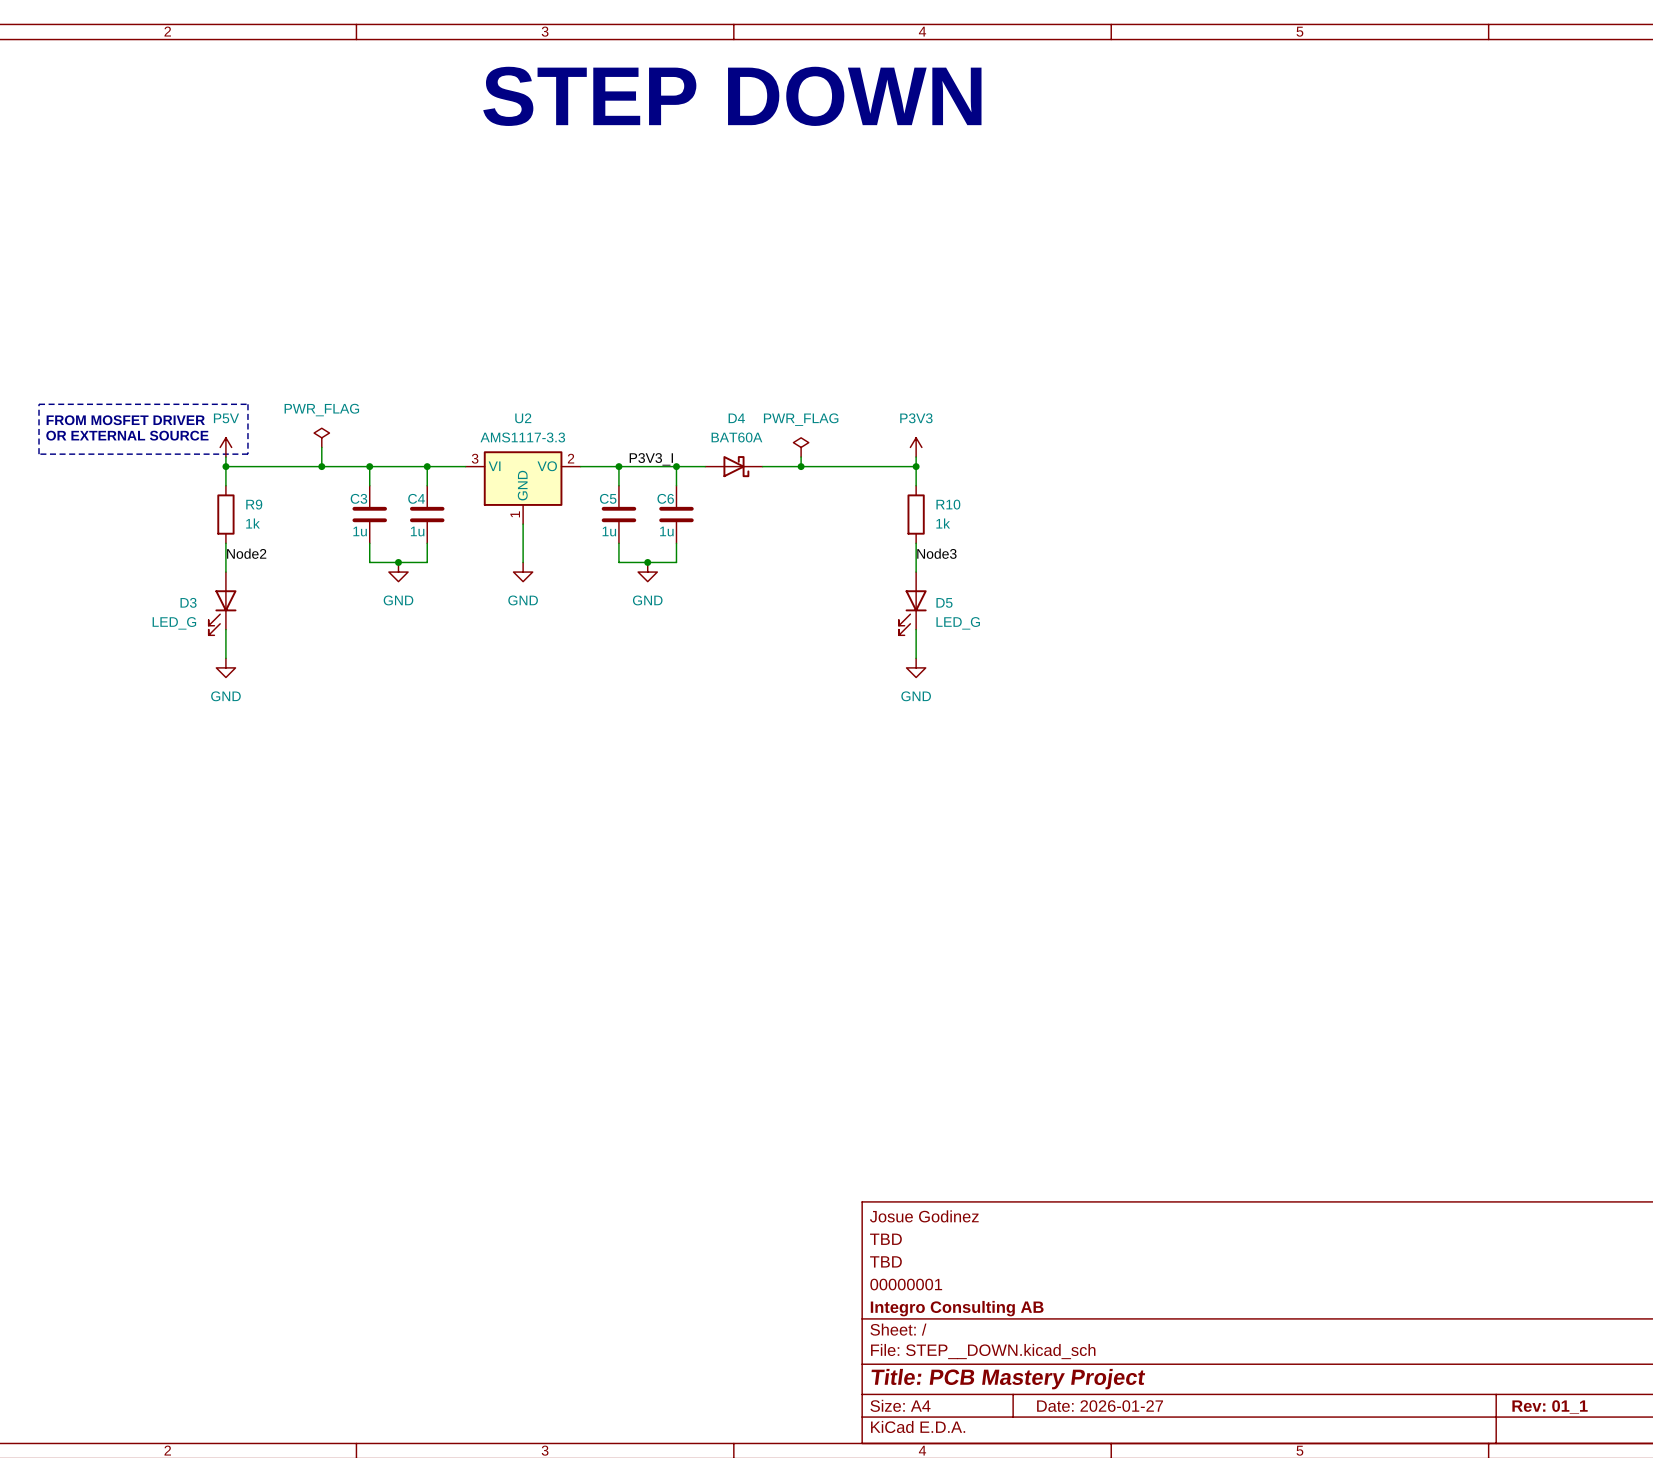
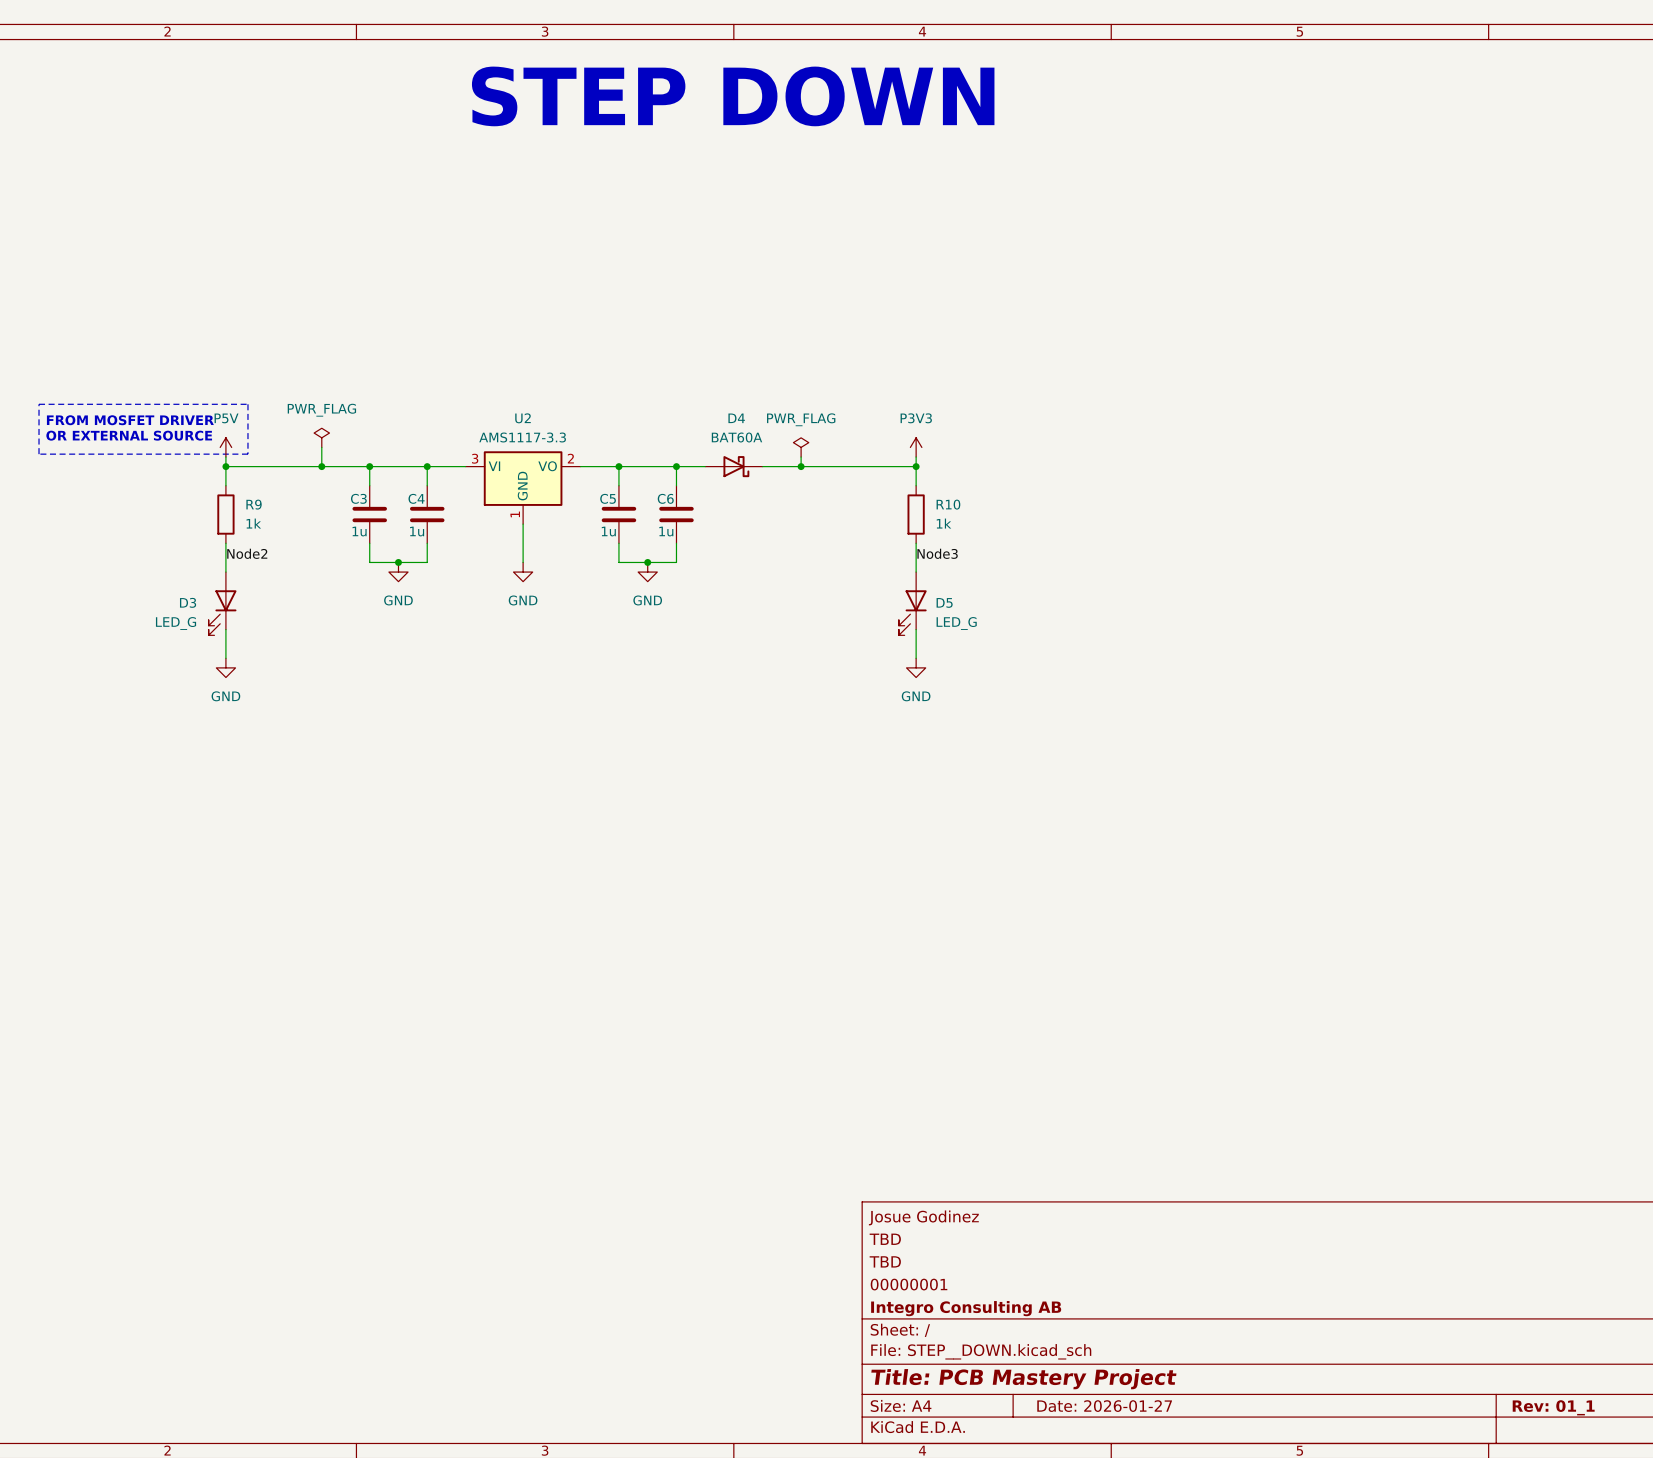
label: P3V3_I (651, 459) -> none

